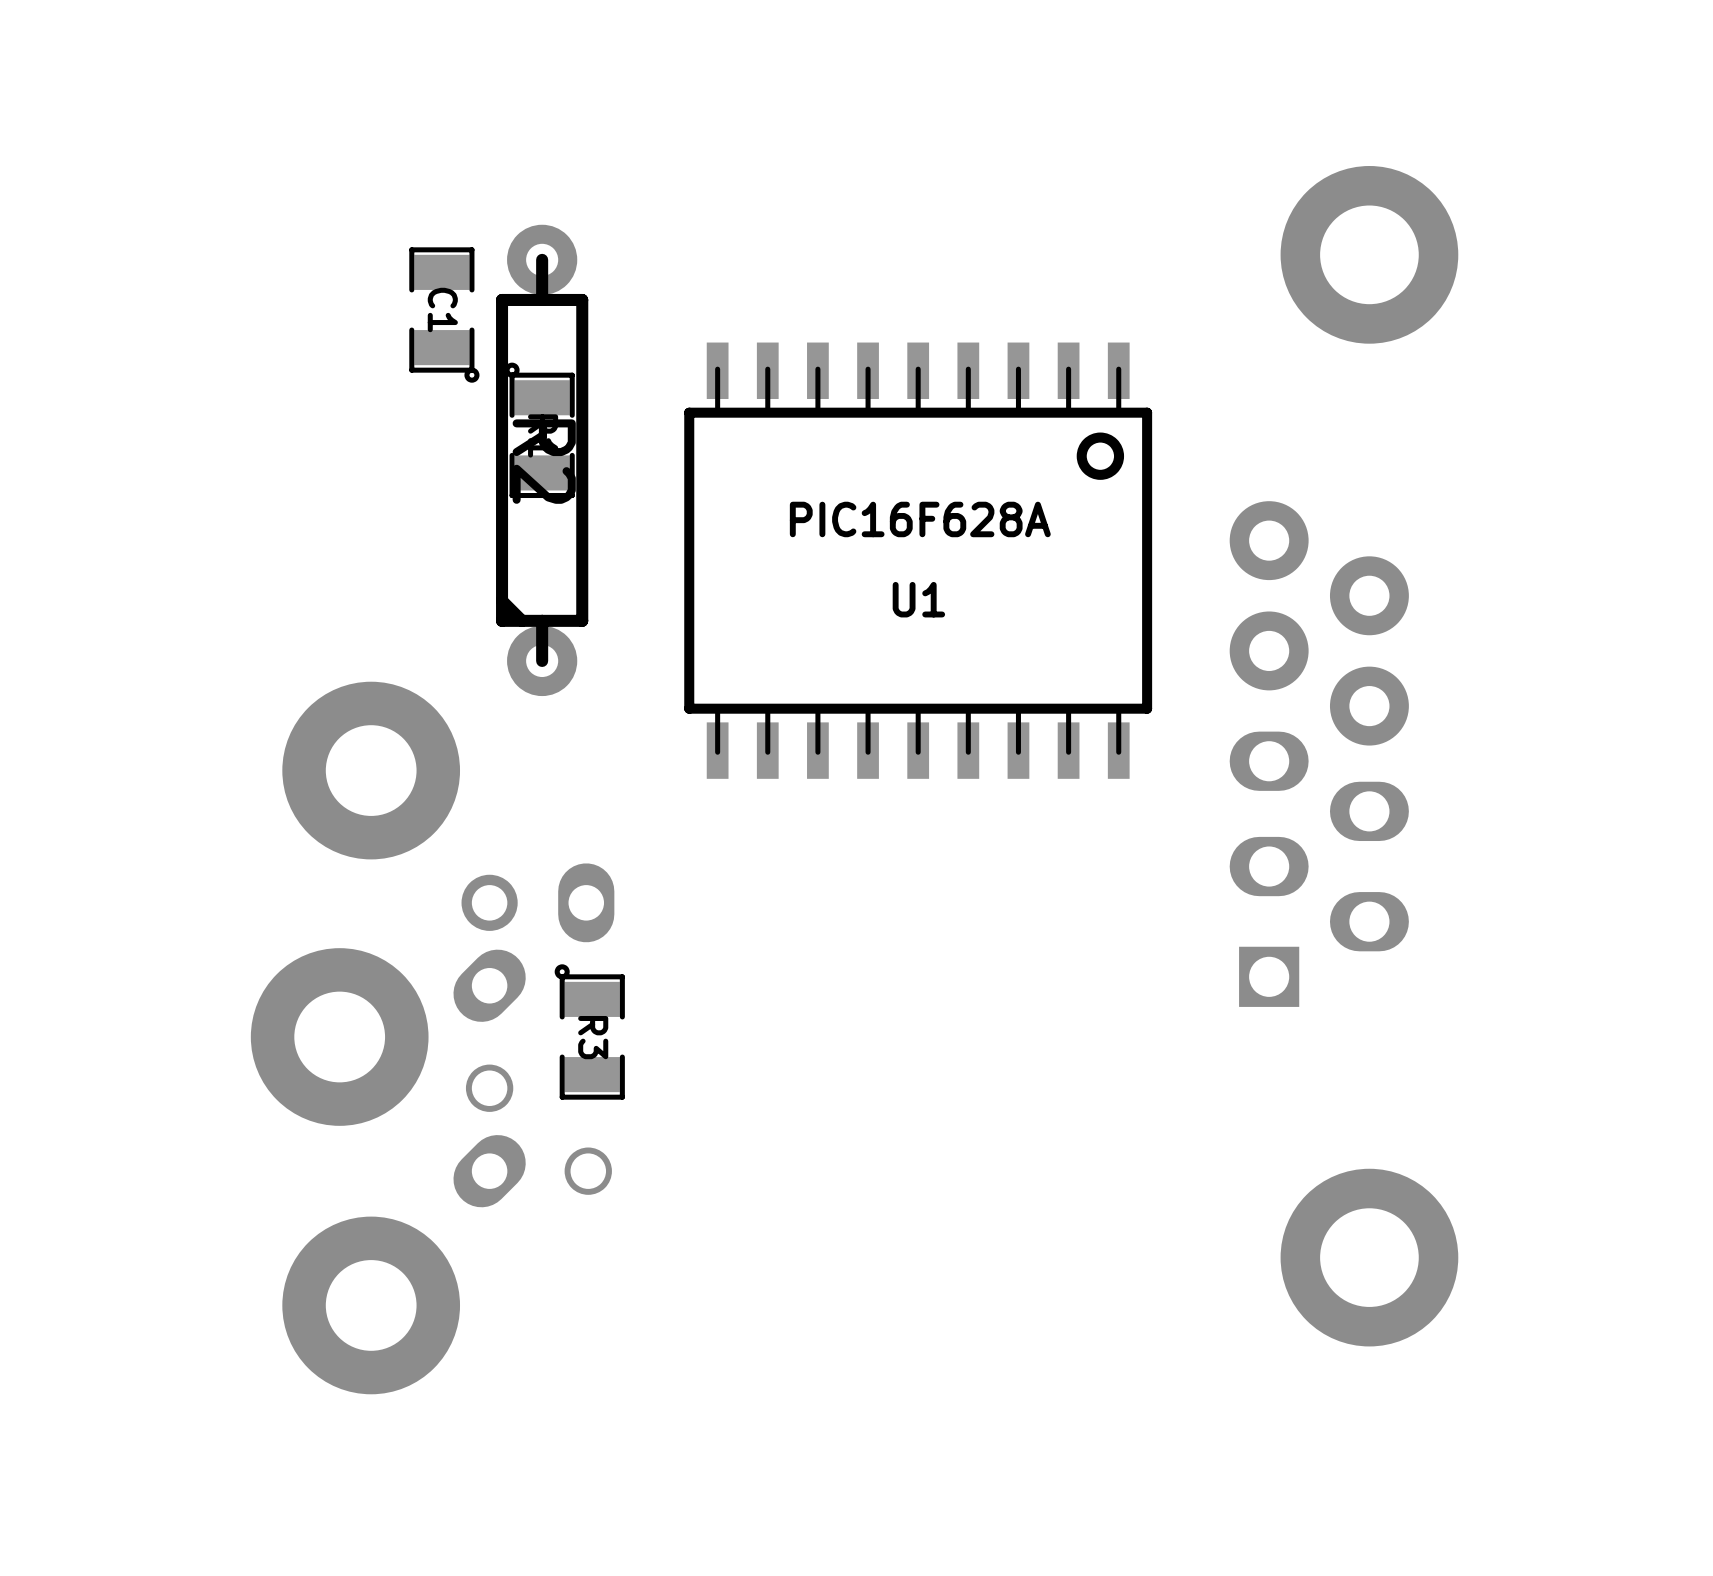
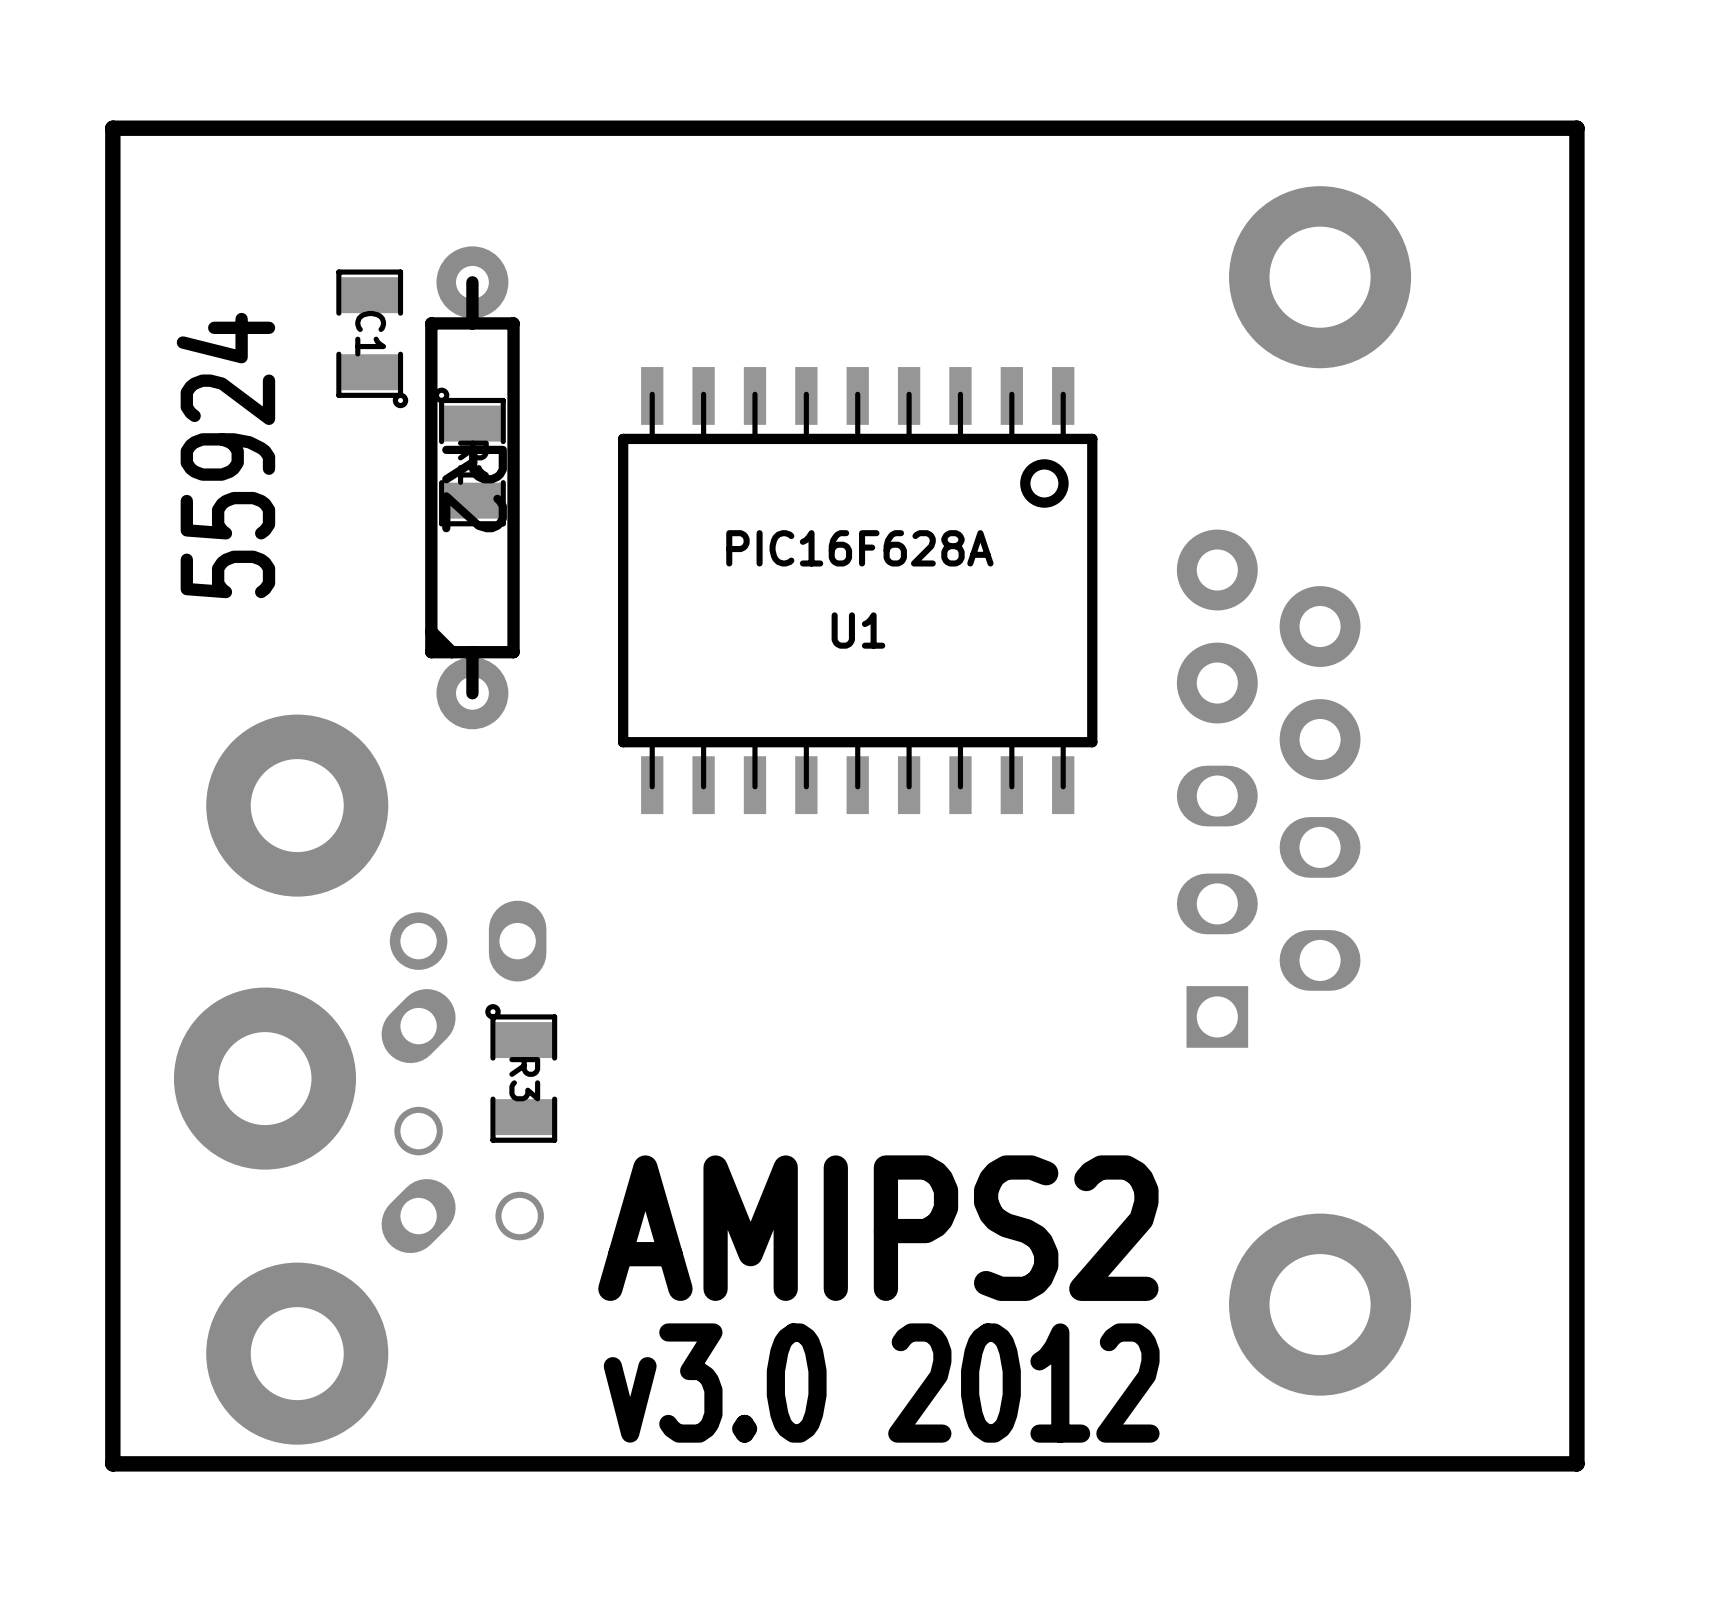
line: none -> (1576, 128) (112, 128) (112, 1463) (1576, 1463) (1576, 128)
text: none -> 55924 (225, 455)
text: none -> AMIPS2 (878, 1228)
text: none -> v3.0 2012 (881, 1383)

